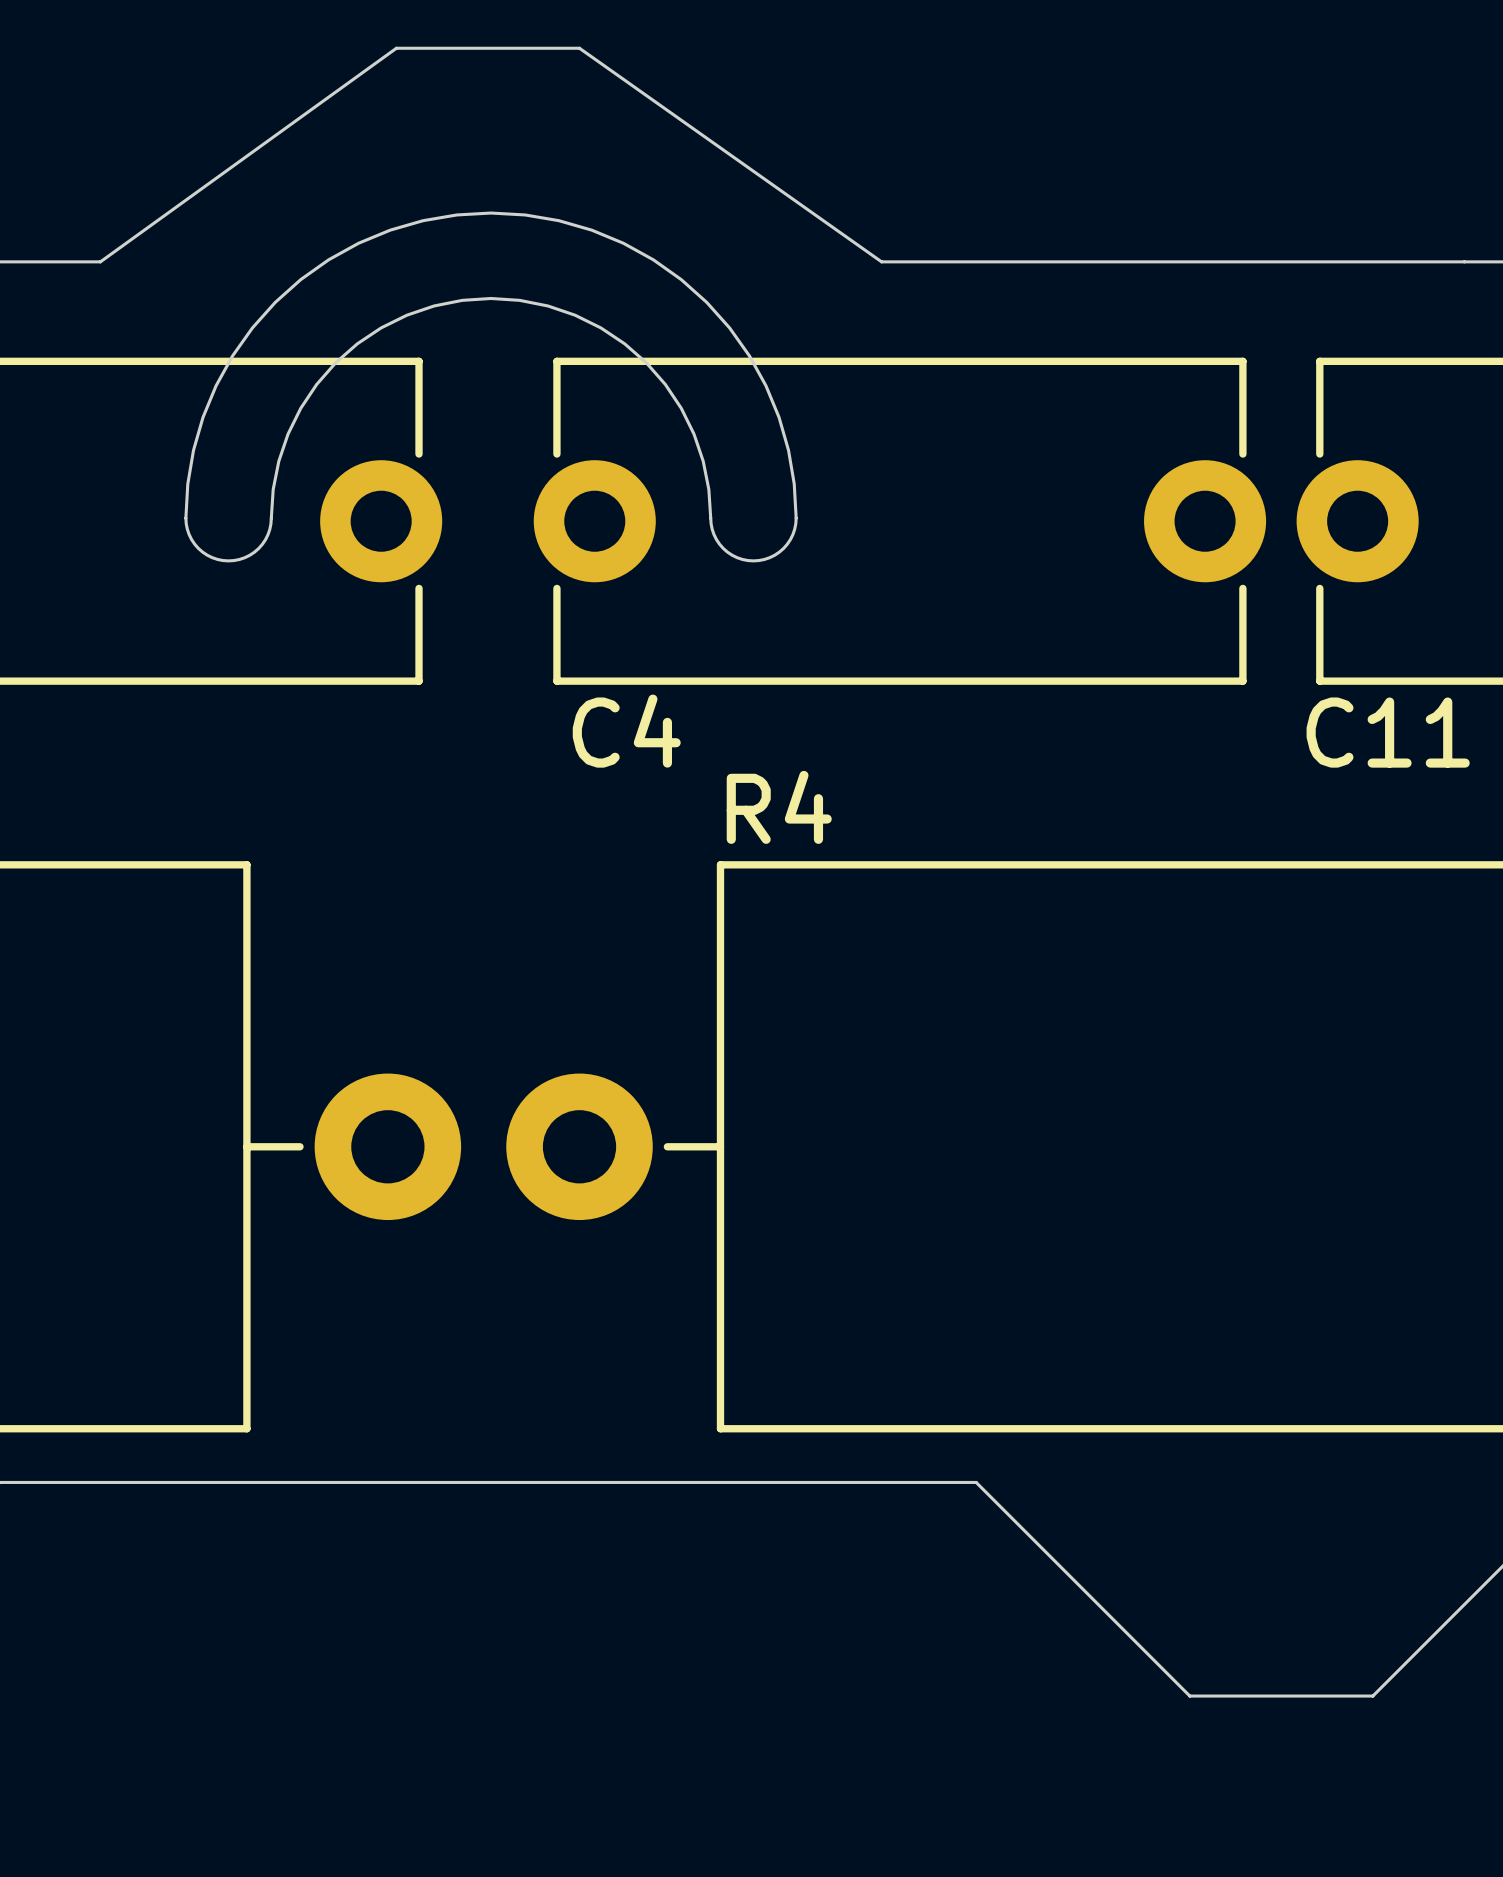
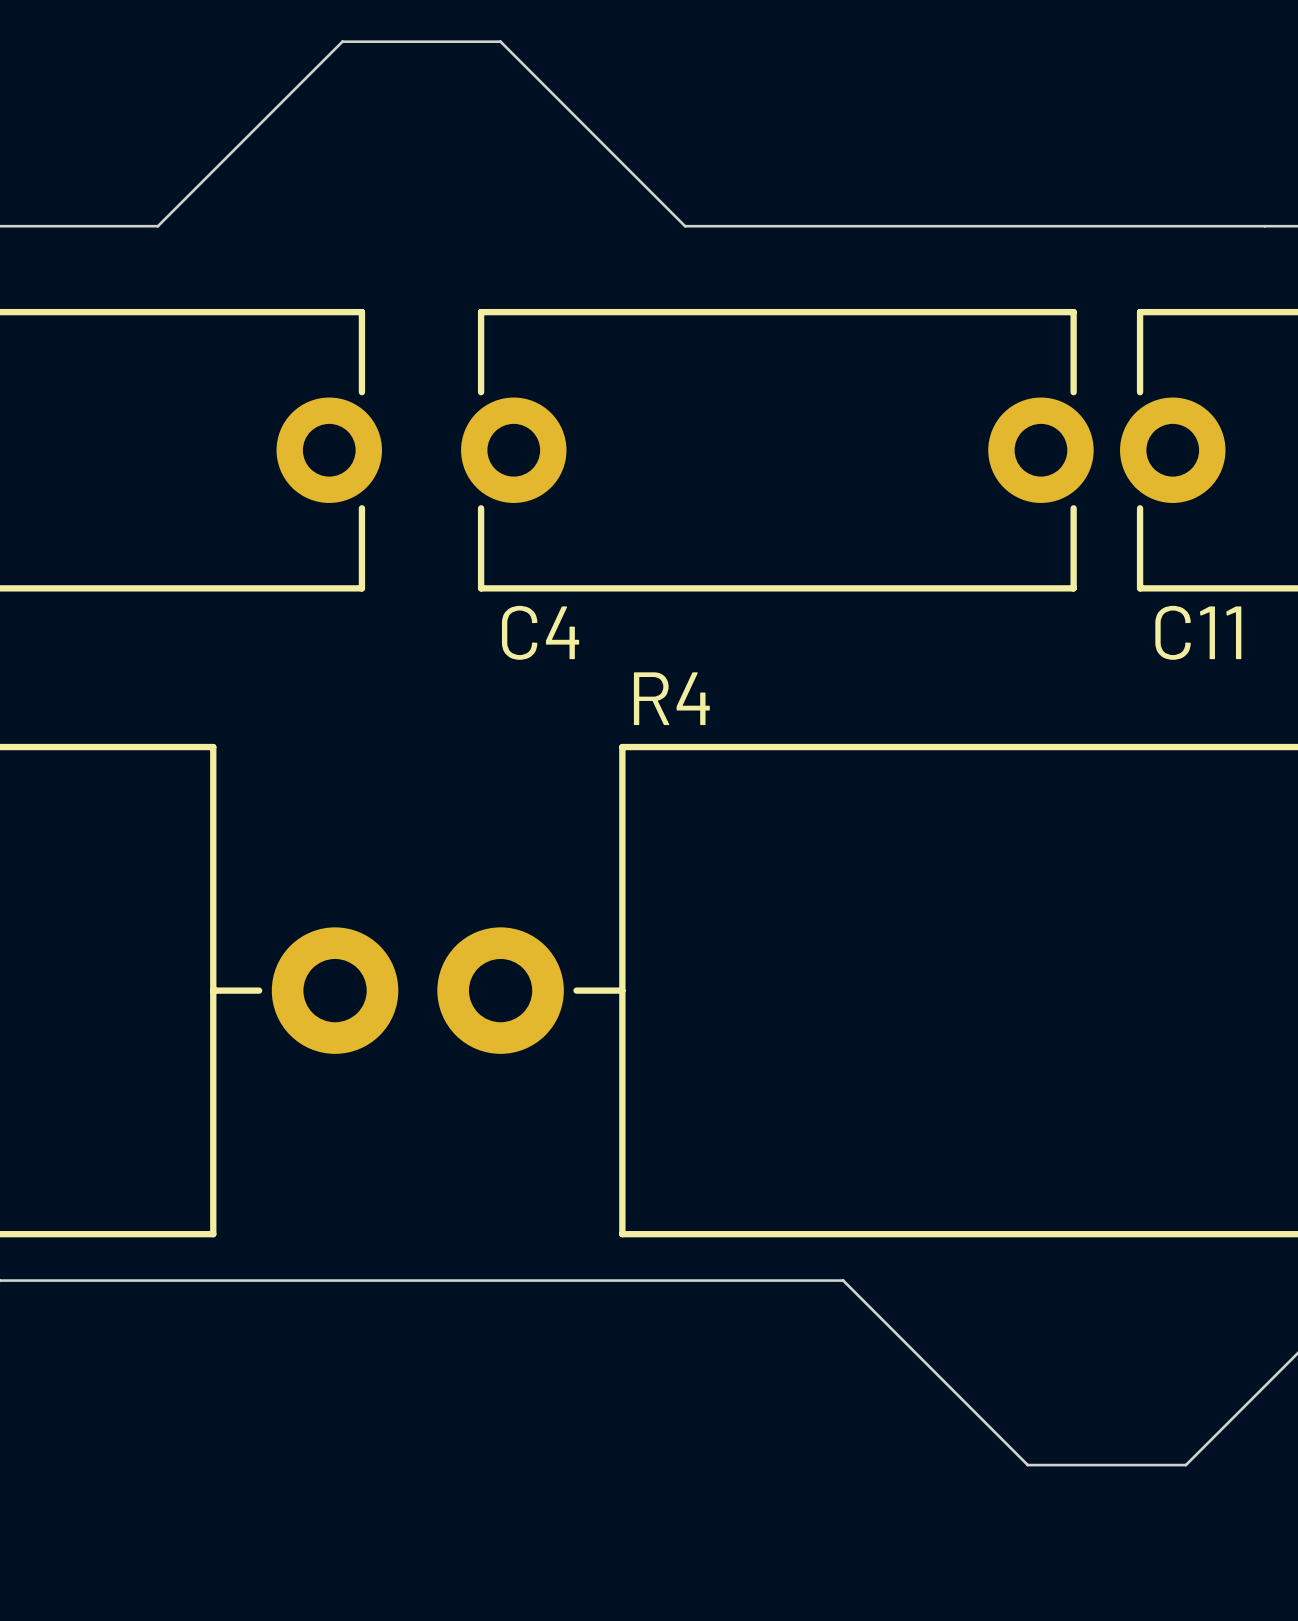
board edge: (396, 48) (100, 261) -> (342, 41) (157, 226) (86, 226)
board edge: (579, 48) (881, 261) -> (500, 41) (685, 226) (761, 226)
board edge: (185, 518) (187, 484) (193, 450) (203, 417) (216, 385) (232, 355) (252, 327) (275, 302) (300, 279) (328, 259) (358, 243) (390, 230) (423, 220) (456, 214) (491, 213) (525, 214) (558, 220) (591, 230) (623, 243) (653, 259) (681, 279) (706, 302) (729, 327) (749, 355) (765, 385) (779, 417) (788, 450) (794, 484) (796, 518) (790, 539) (779, 552) (769, 557) (747, 560) (727, 552) (716, 539) (712, 529) (708, 489) (703, 461) (694, 434) (681, 408) (665, 384) (646, 362) (624, 343) (600, 327) (575, 315) (547, 305) (519, 300) (491, 298) (462, 300) (434, 305) (406, 315) (381, 327) (357, 343) (335, 362) (316, 384) (300, 408) (288, 434) (278, 461) (273, 489) (269, 529) (262, 544) (254, 552) (234, 560) (212, 557) (194, 544) (189, 534) (185, 518) -> none

